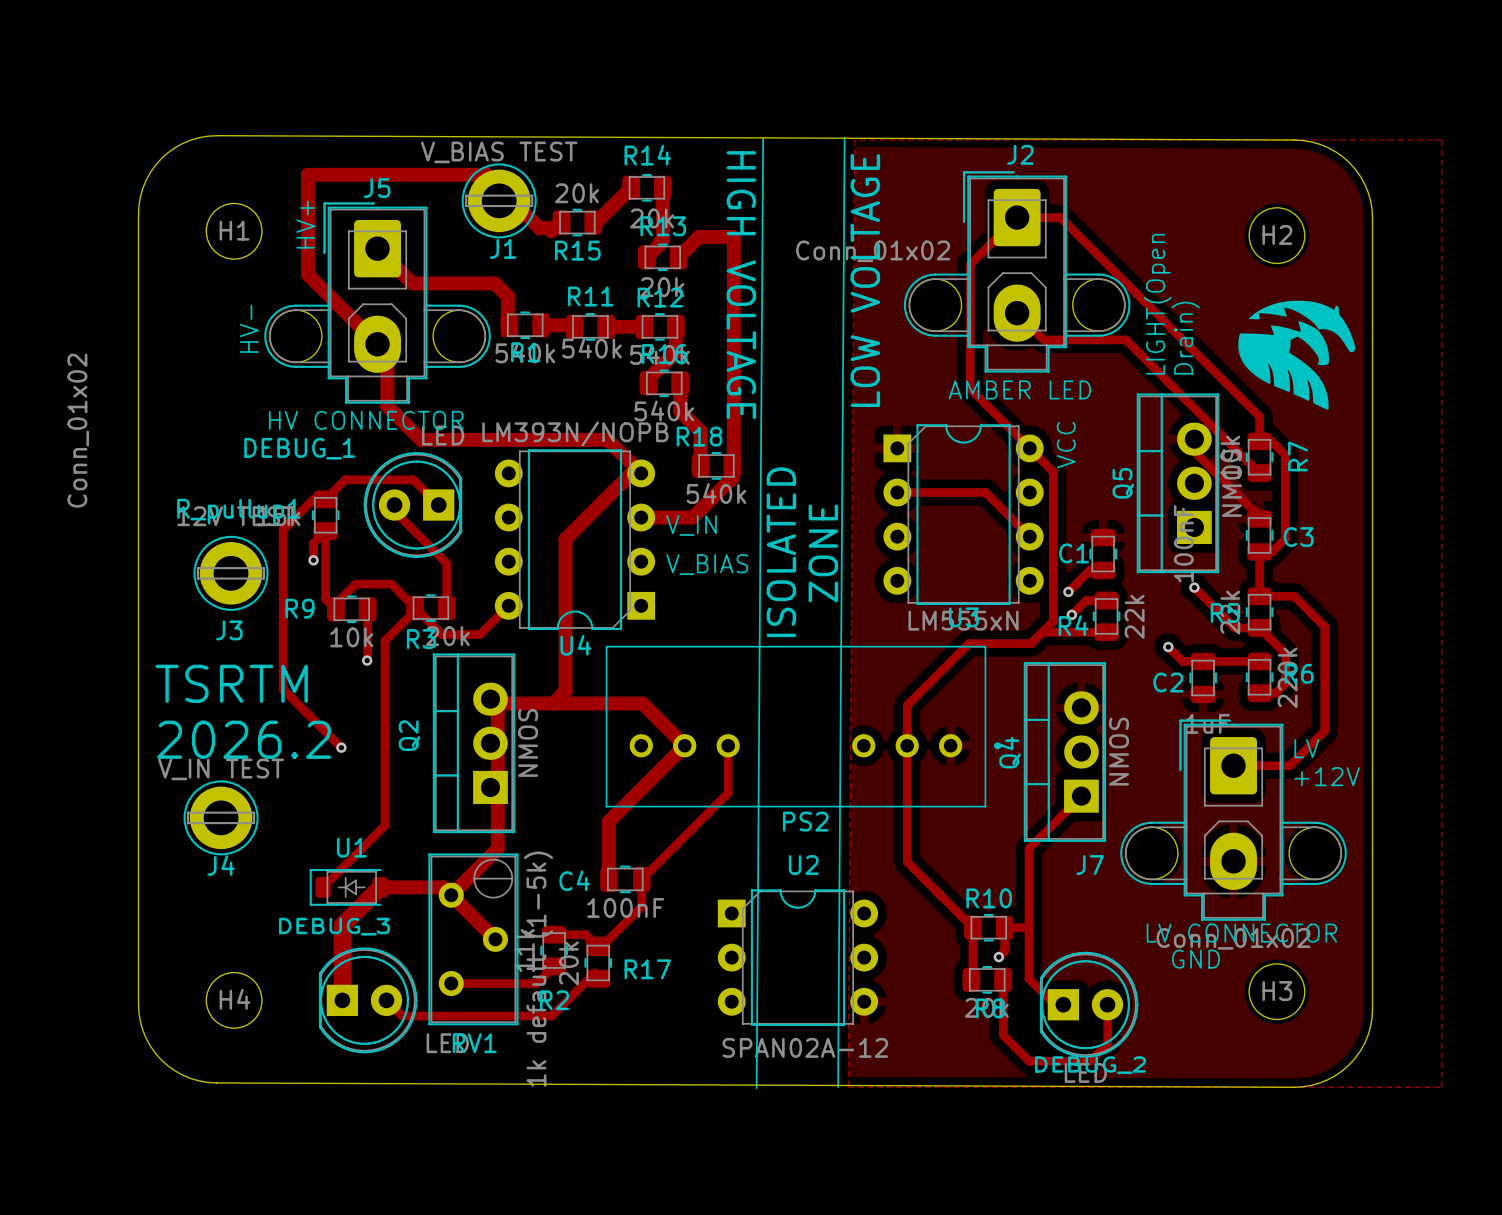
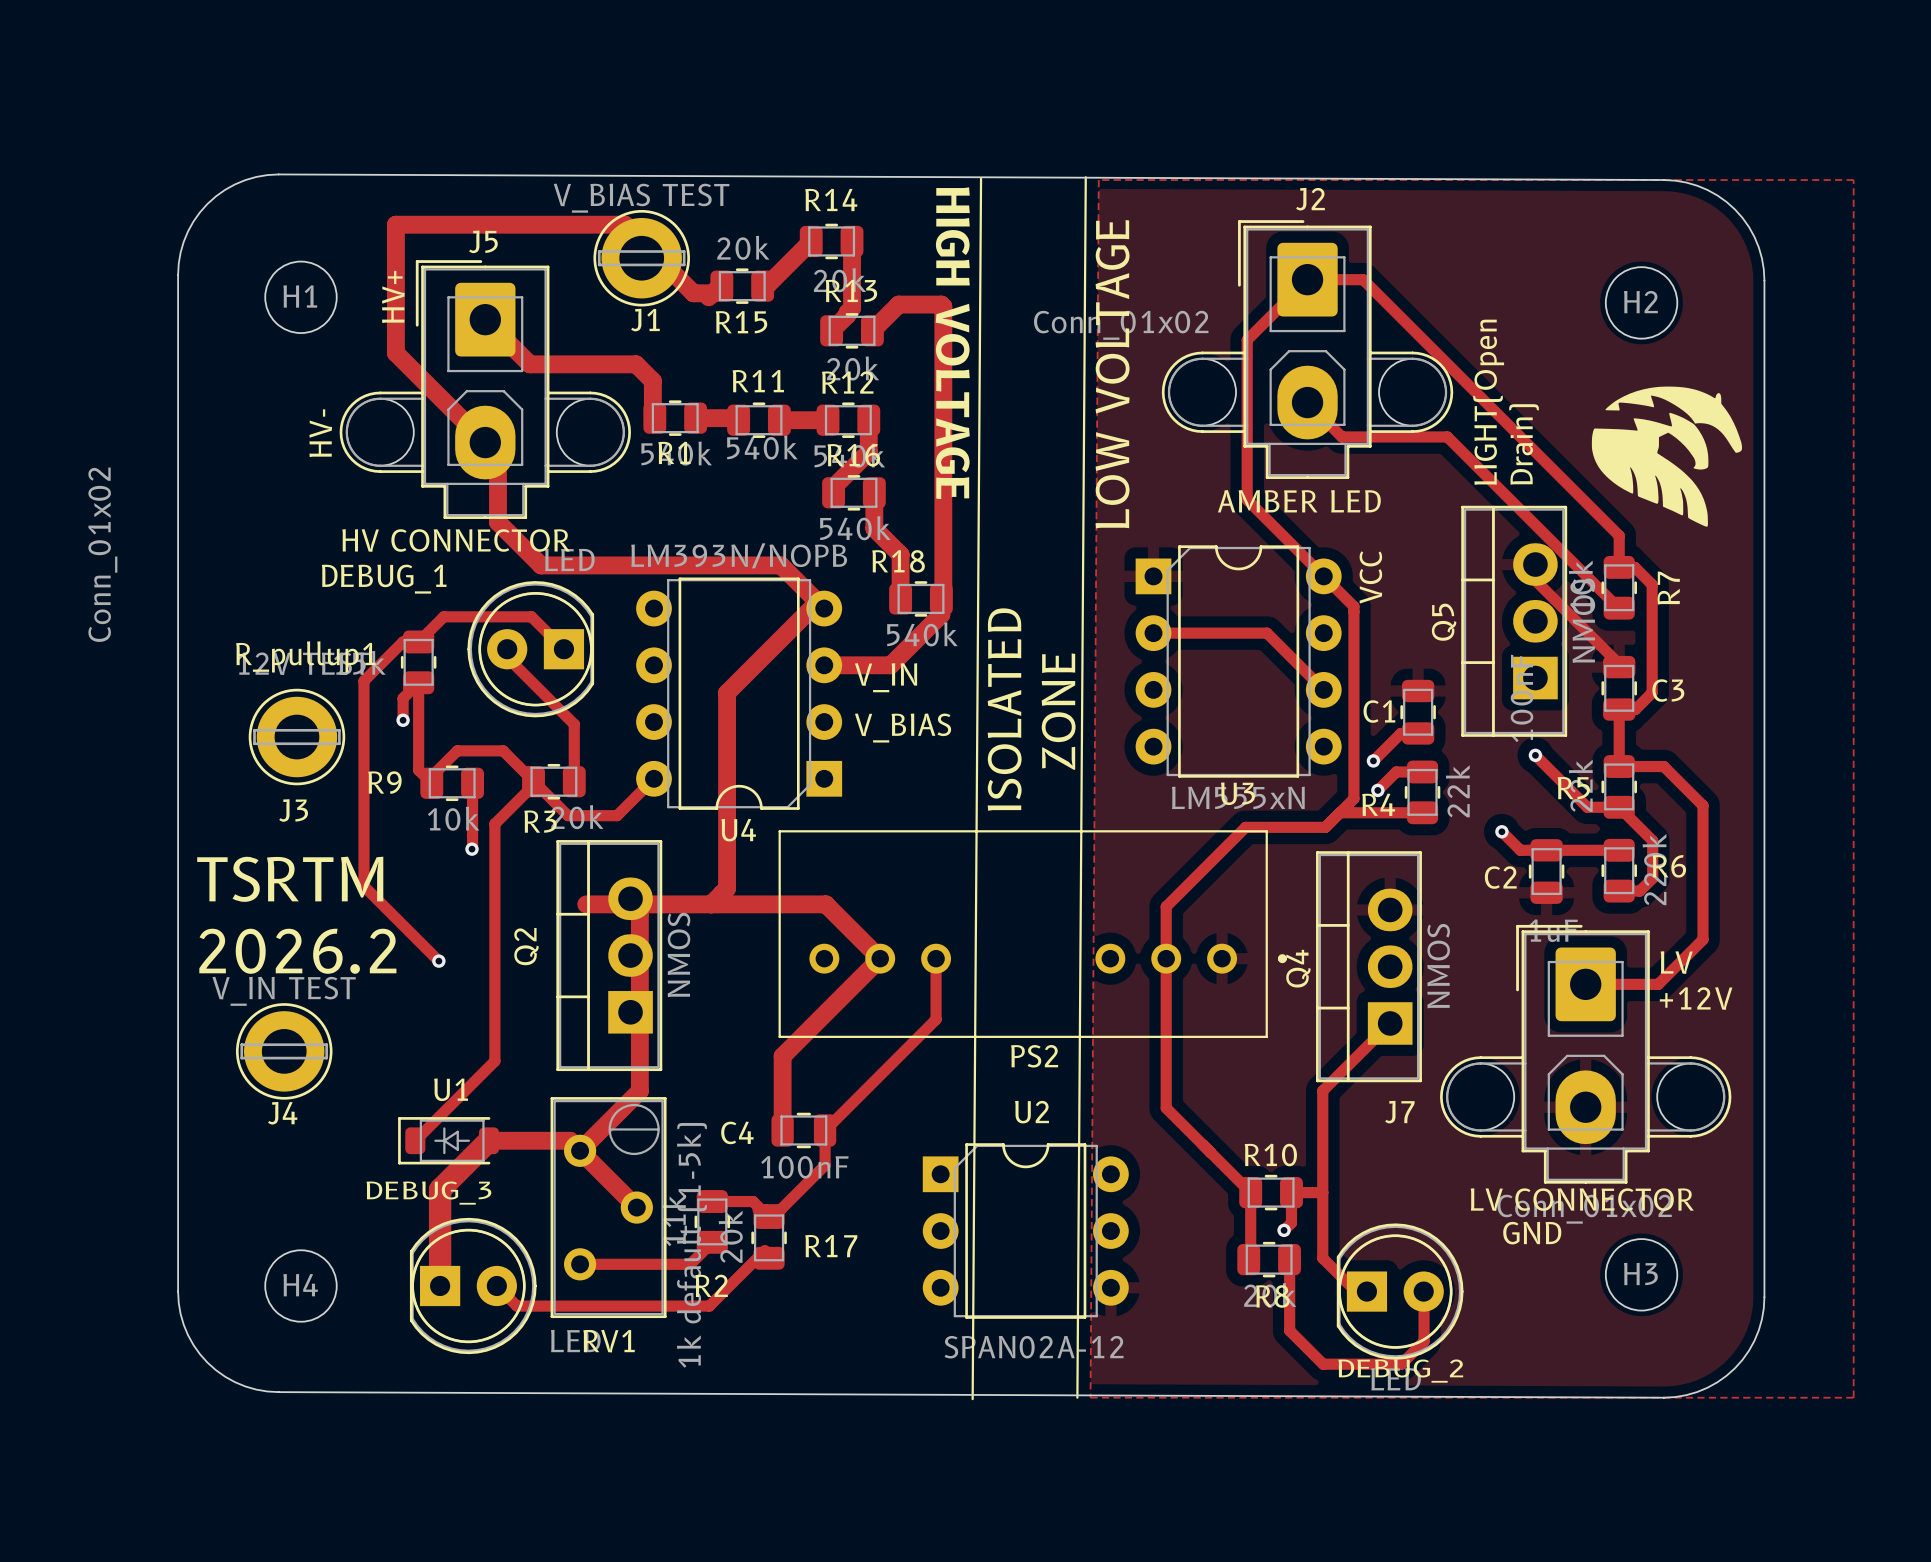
track: none -> (586, 904) (630, 904)

